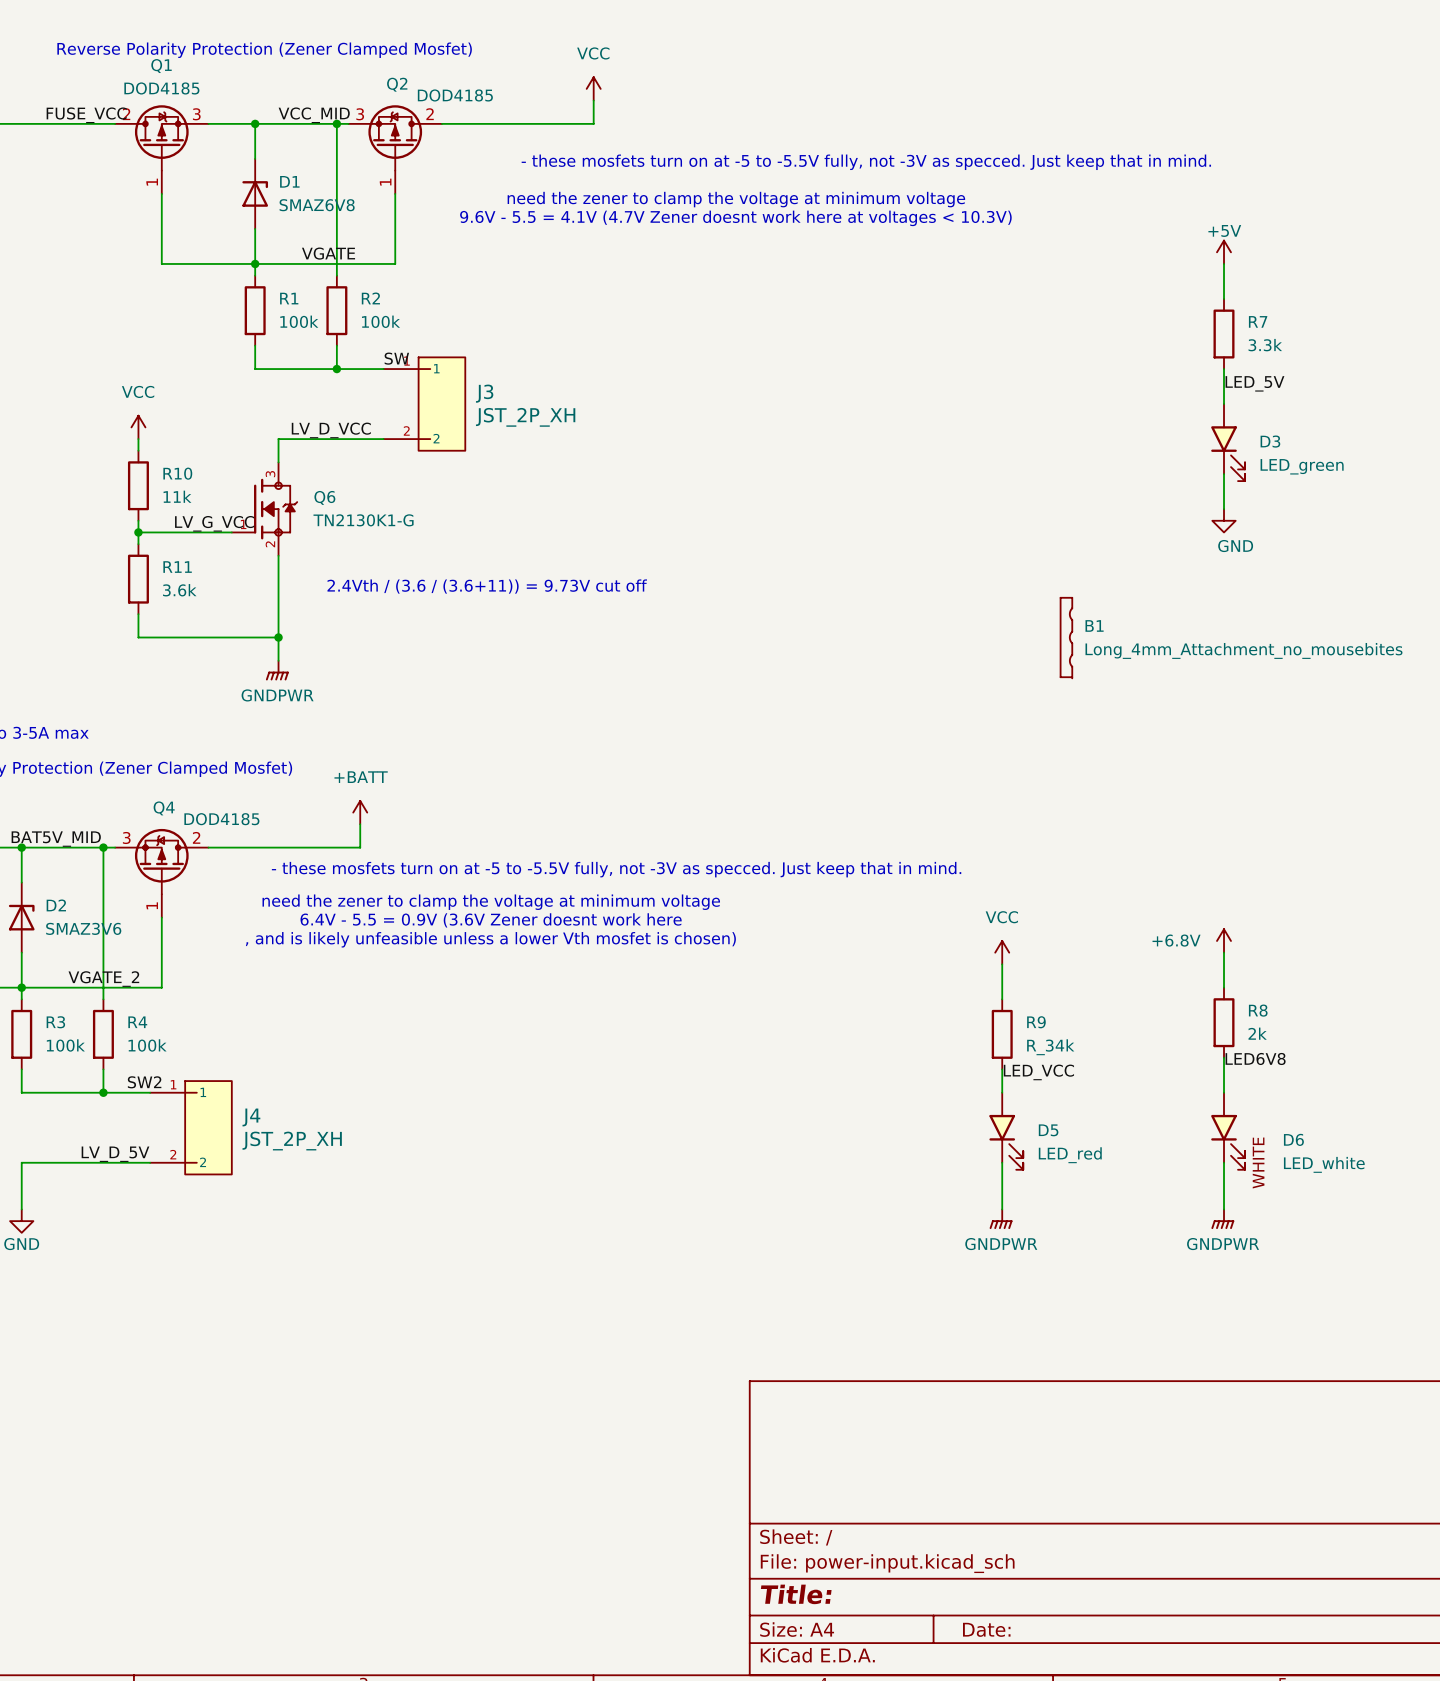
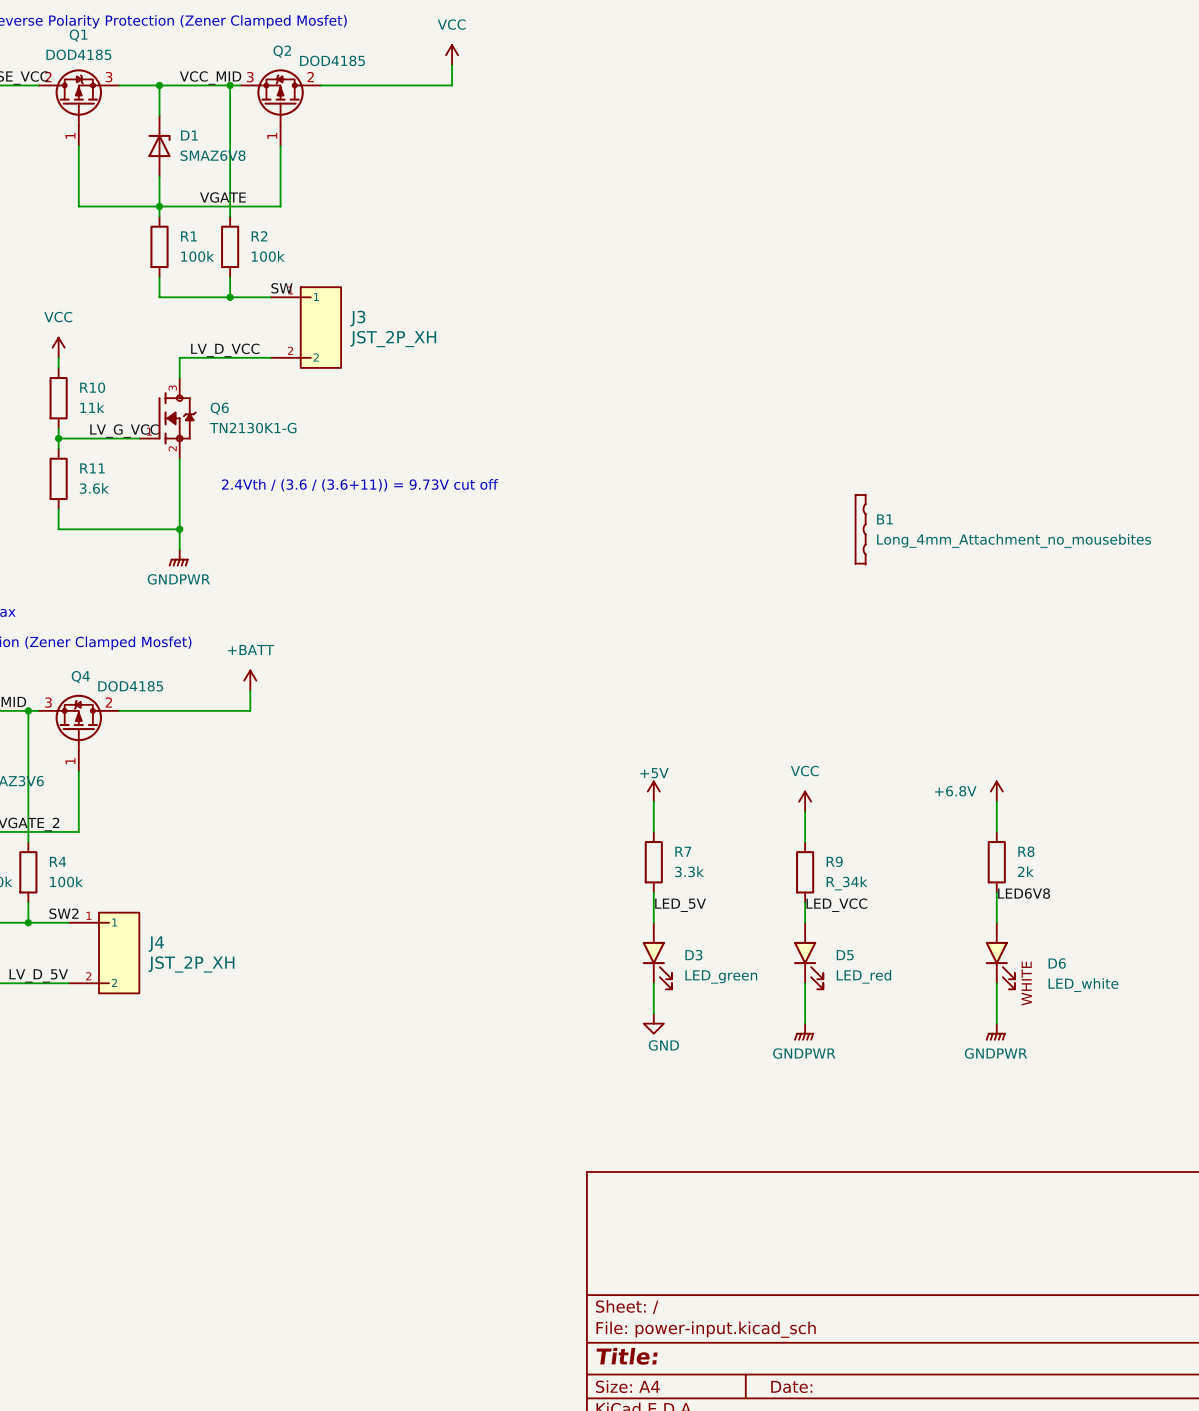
text: - these mosfets turn on at -5 to -5.5V fully, not -3V as specced. Just keep that in mind. (866, 162) -> none
text: need the zener to clamp the voltage at minimum voltage (736, 199) -> none
text: 9.6V - 5.5 = 4.1V (4.7V Zener doesnt work here at voltages < 10.3V) (735, 218) -> none
power symbol: +5V (1224, 252) -> none
wire: (1224, 263) (1224, 299) -> none
R7 position: (1224, 334) -> (653, 862)
wire: (1224, 369) (1224, 404) -> none
label: LED_5V (1254, 383) -> none
D3 position: (1228, 442) -> (657, 956)
wire: (1224, 474) (1224, 509) -> none
power symbol: GND (1224, 520) -> none
text: - these mosfets turn on at -5 to -5.5V fully, not -3V as specced. Just keep that in mind. (616, 869) -> none
text: need the zener to clamp the voltage at minimum voltage (491, 902) -> none
text: 6.4V - 5.5 = 0.9V (3.6V Zener doesnt work here (491, 920) -> none
text: , and is likely unfeasible unless a lower Vth mosfet is chosen) (490, 939) -> none
power symbol: none -> +5V (653, 791)
wire: none -> (653, 801) (653, 831)
wire: none -> (653, 892) (653, 922)
label: none -> LED_5V (680, 905)
wire: none -> (653, 983) (653, 1013)
power symbol: none -> GND (653, 1023)

